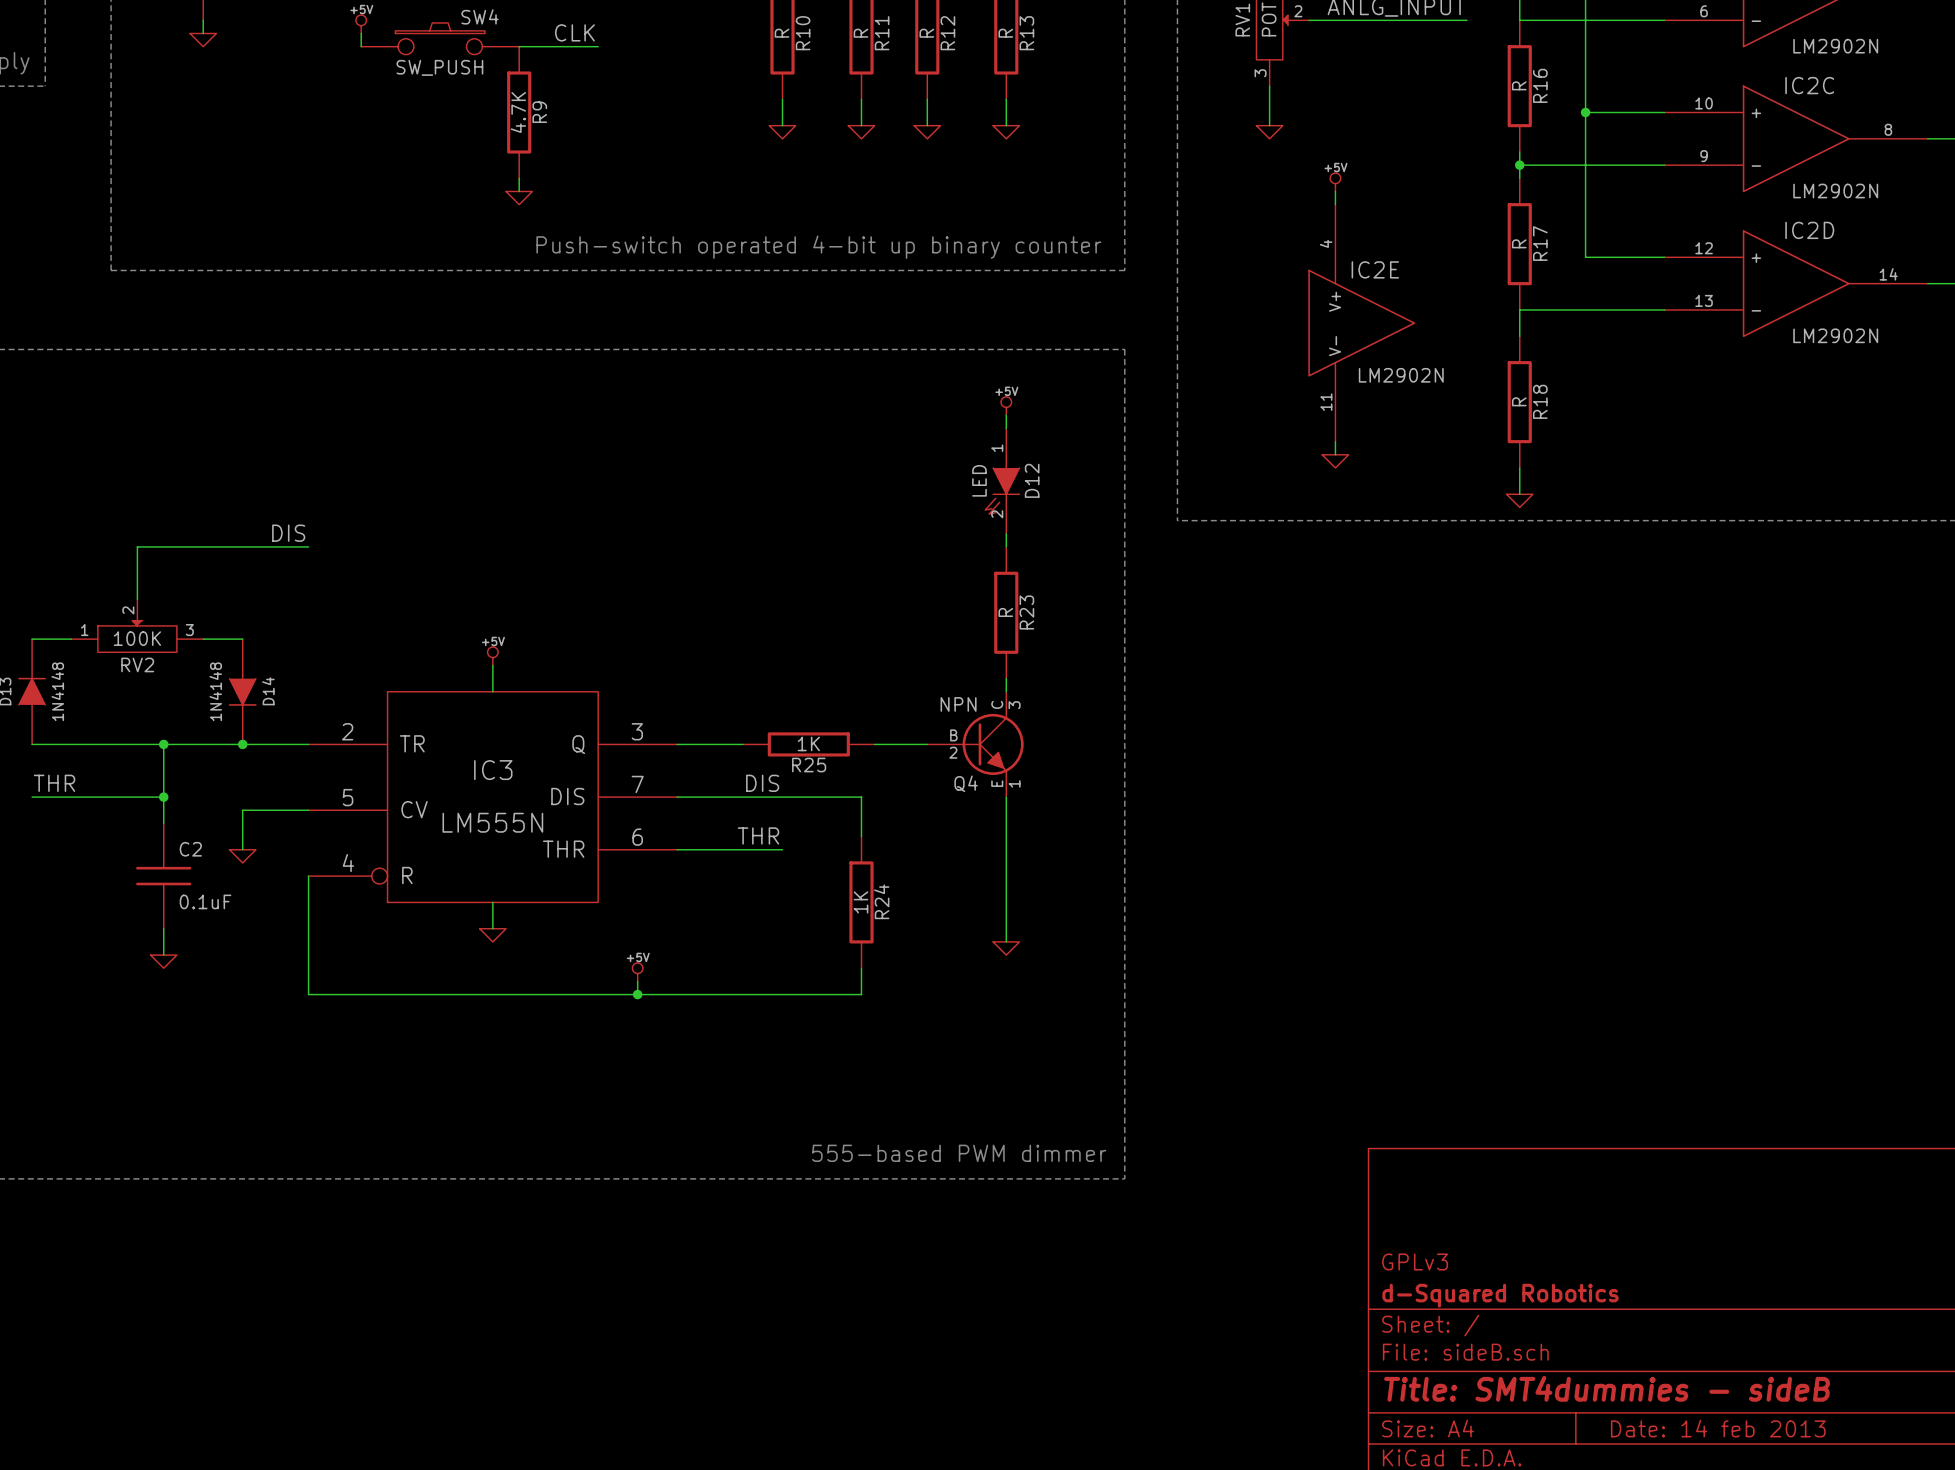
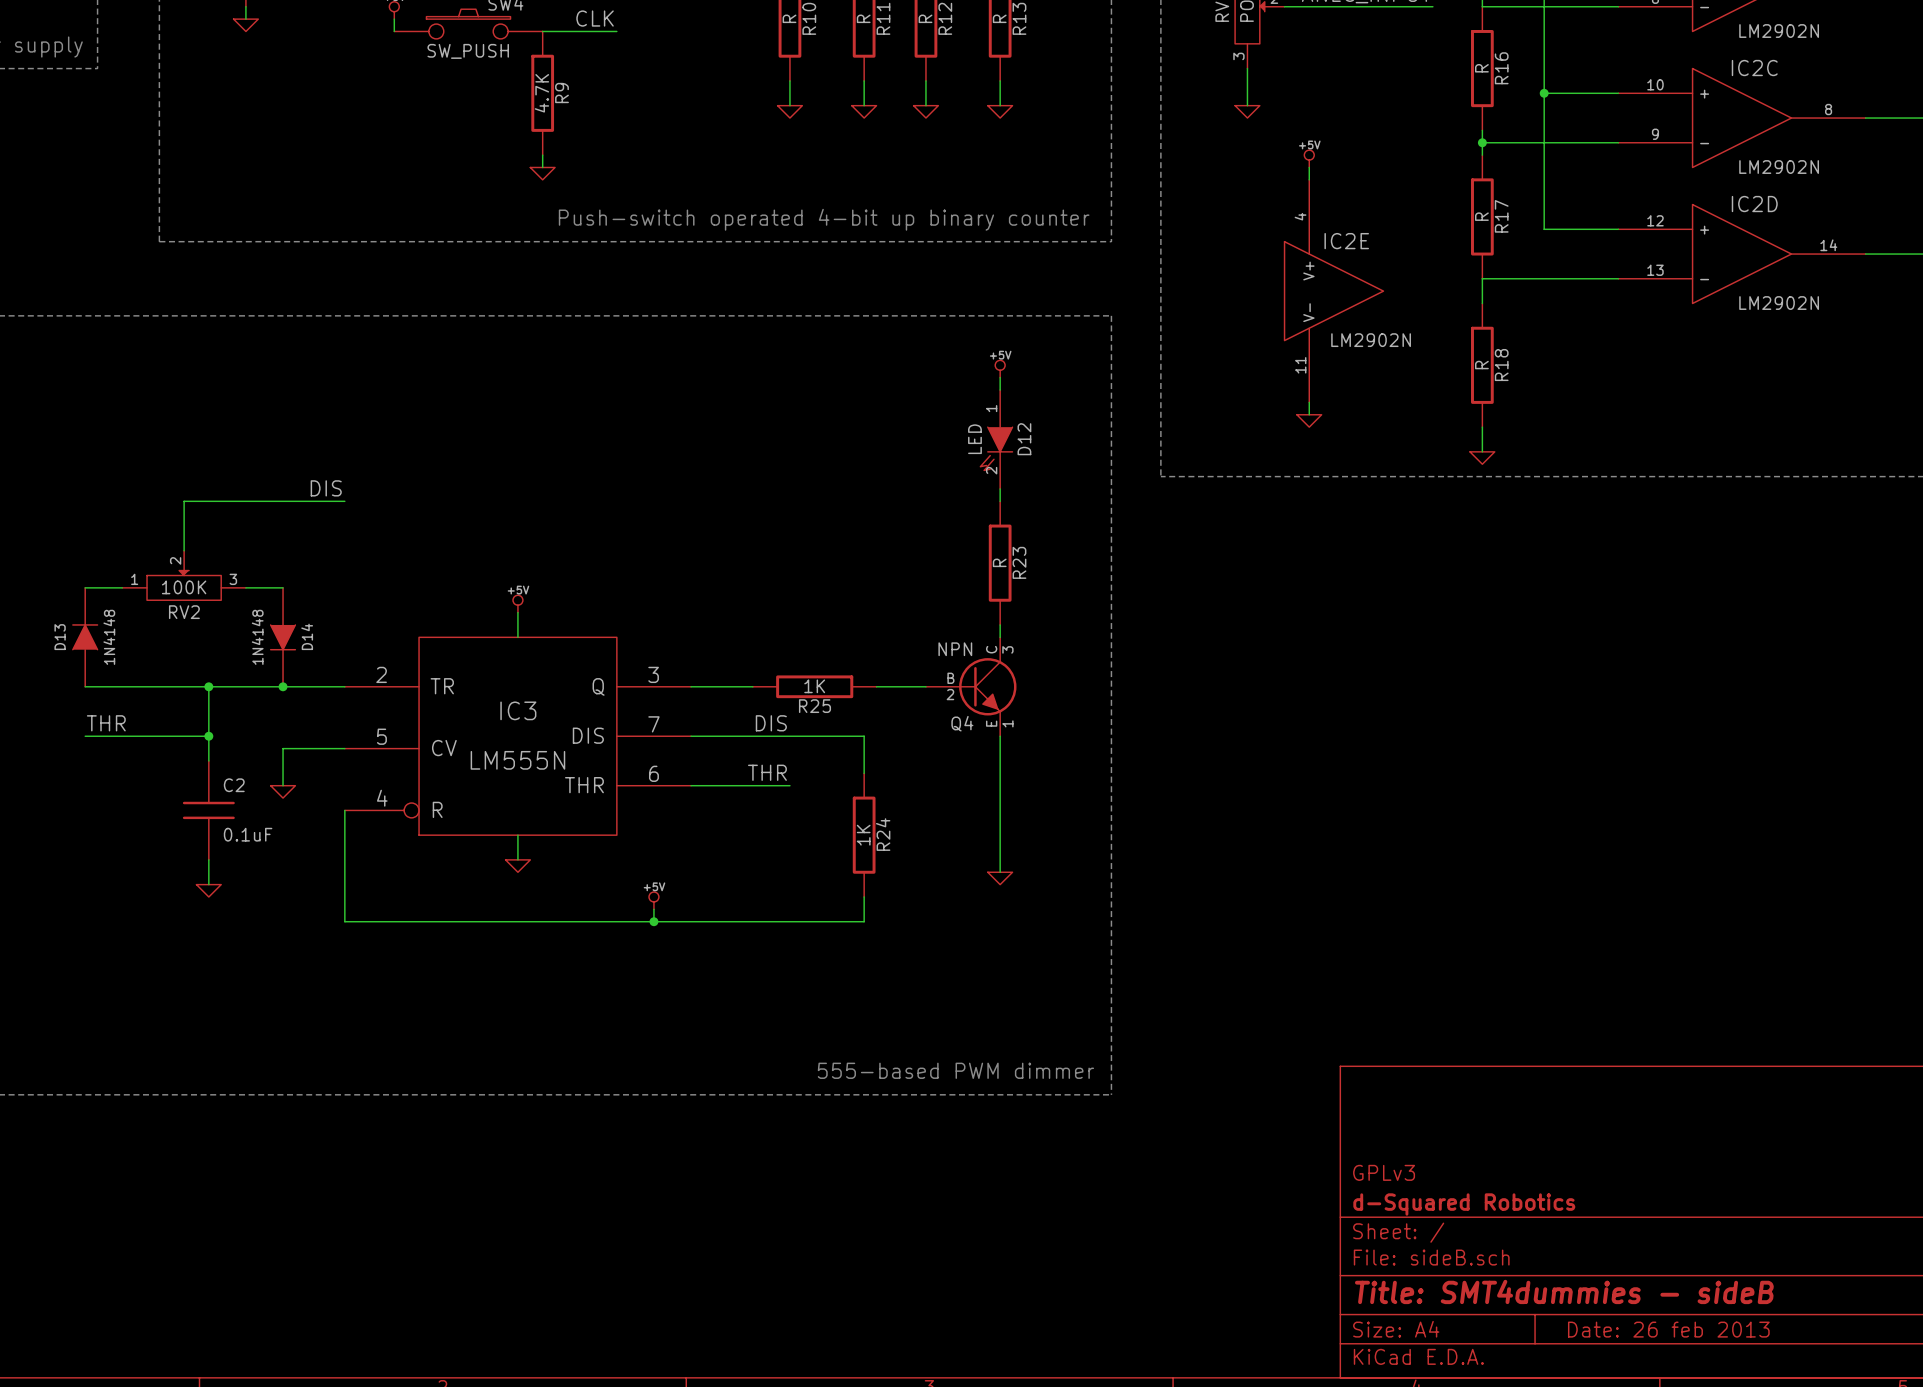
title block: Date: 14 feb 2013 (1718, 1428) -> Date: 26 feb 2013 (1668, 1329)

